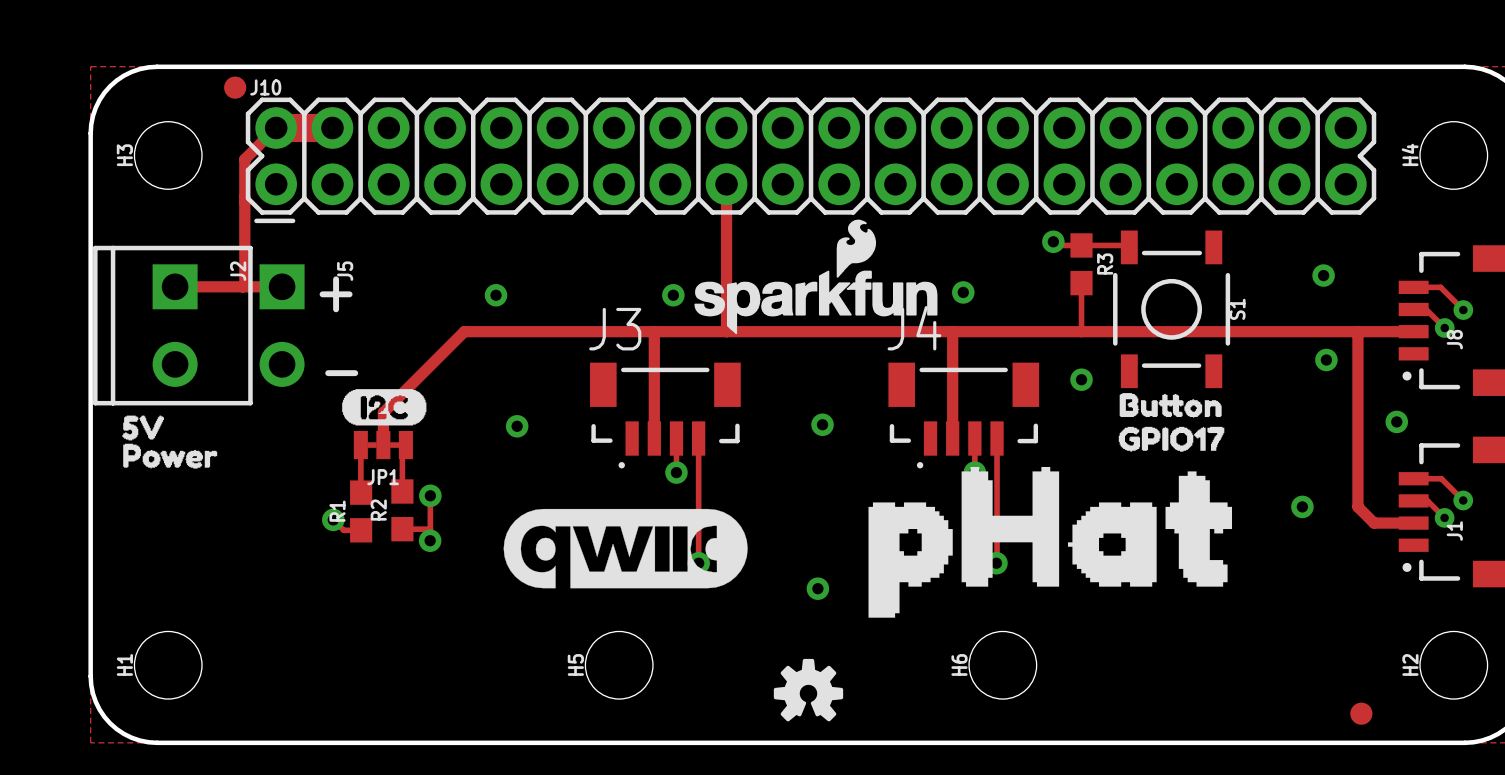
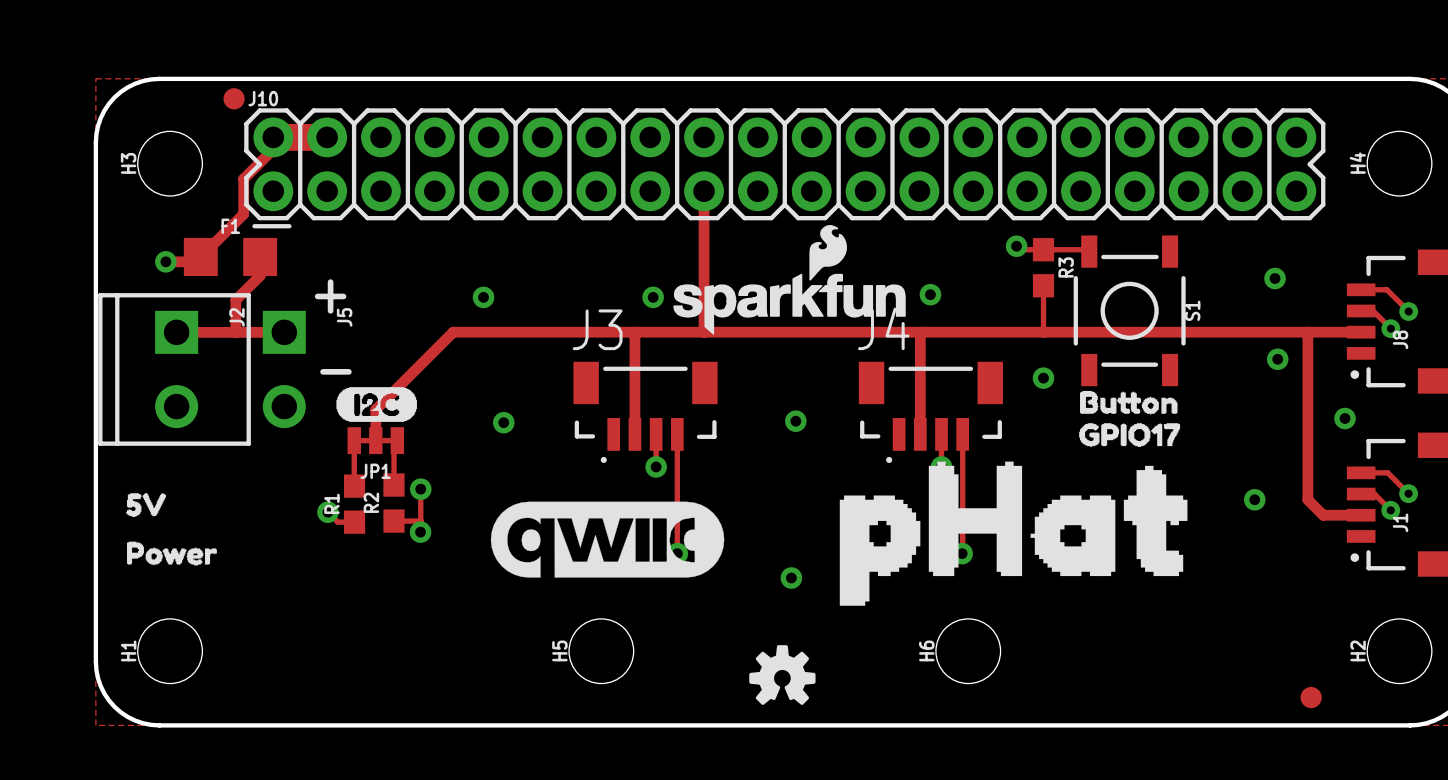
track: (276, 127) (244, 159) (244, 284) (242, 286) -> (273, 137) (273, 149) (243, 178) (243, 214) (195, 261) (165, 261)
F1: none -> (230, 256)
track: none -> (260, 256) (260, 275) (235, 300) (235, 332)
via: none -> (165, 261)
track: (175, 286) (282, 286) -> none
J2 position: (172, 325) -> (174, 369)
J5 position: (282, 325) -> (284, 369)
track: none -> (176, 332) (284, 332)
drawing position: (143, 428) -> (146, 505)
drawing position: (170, 456) -> (171, 553)

